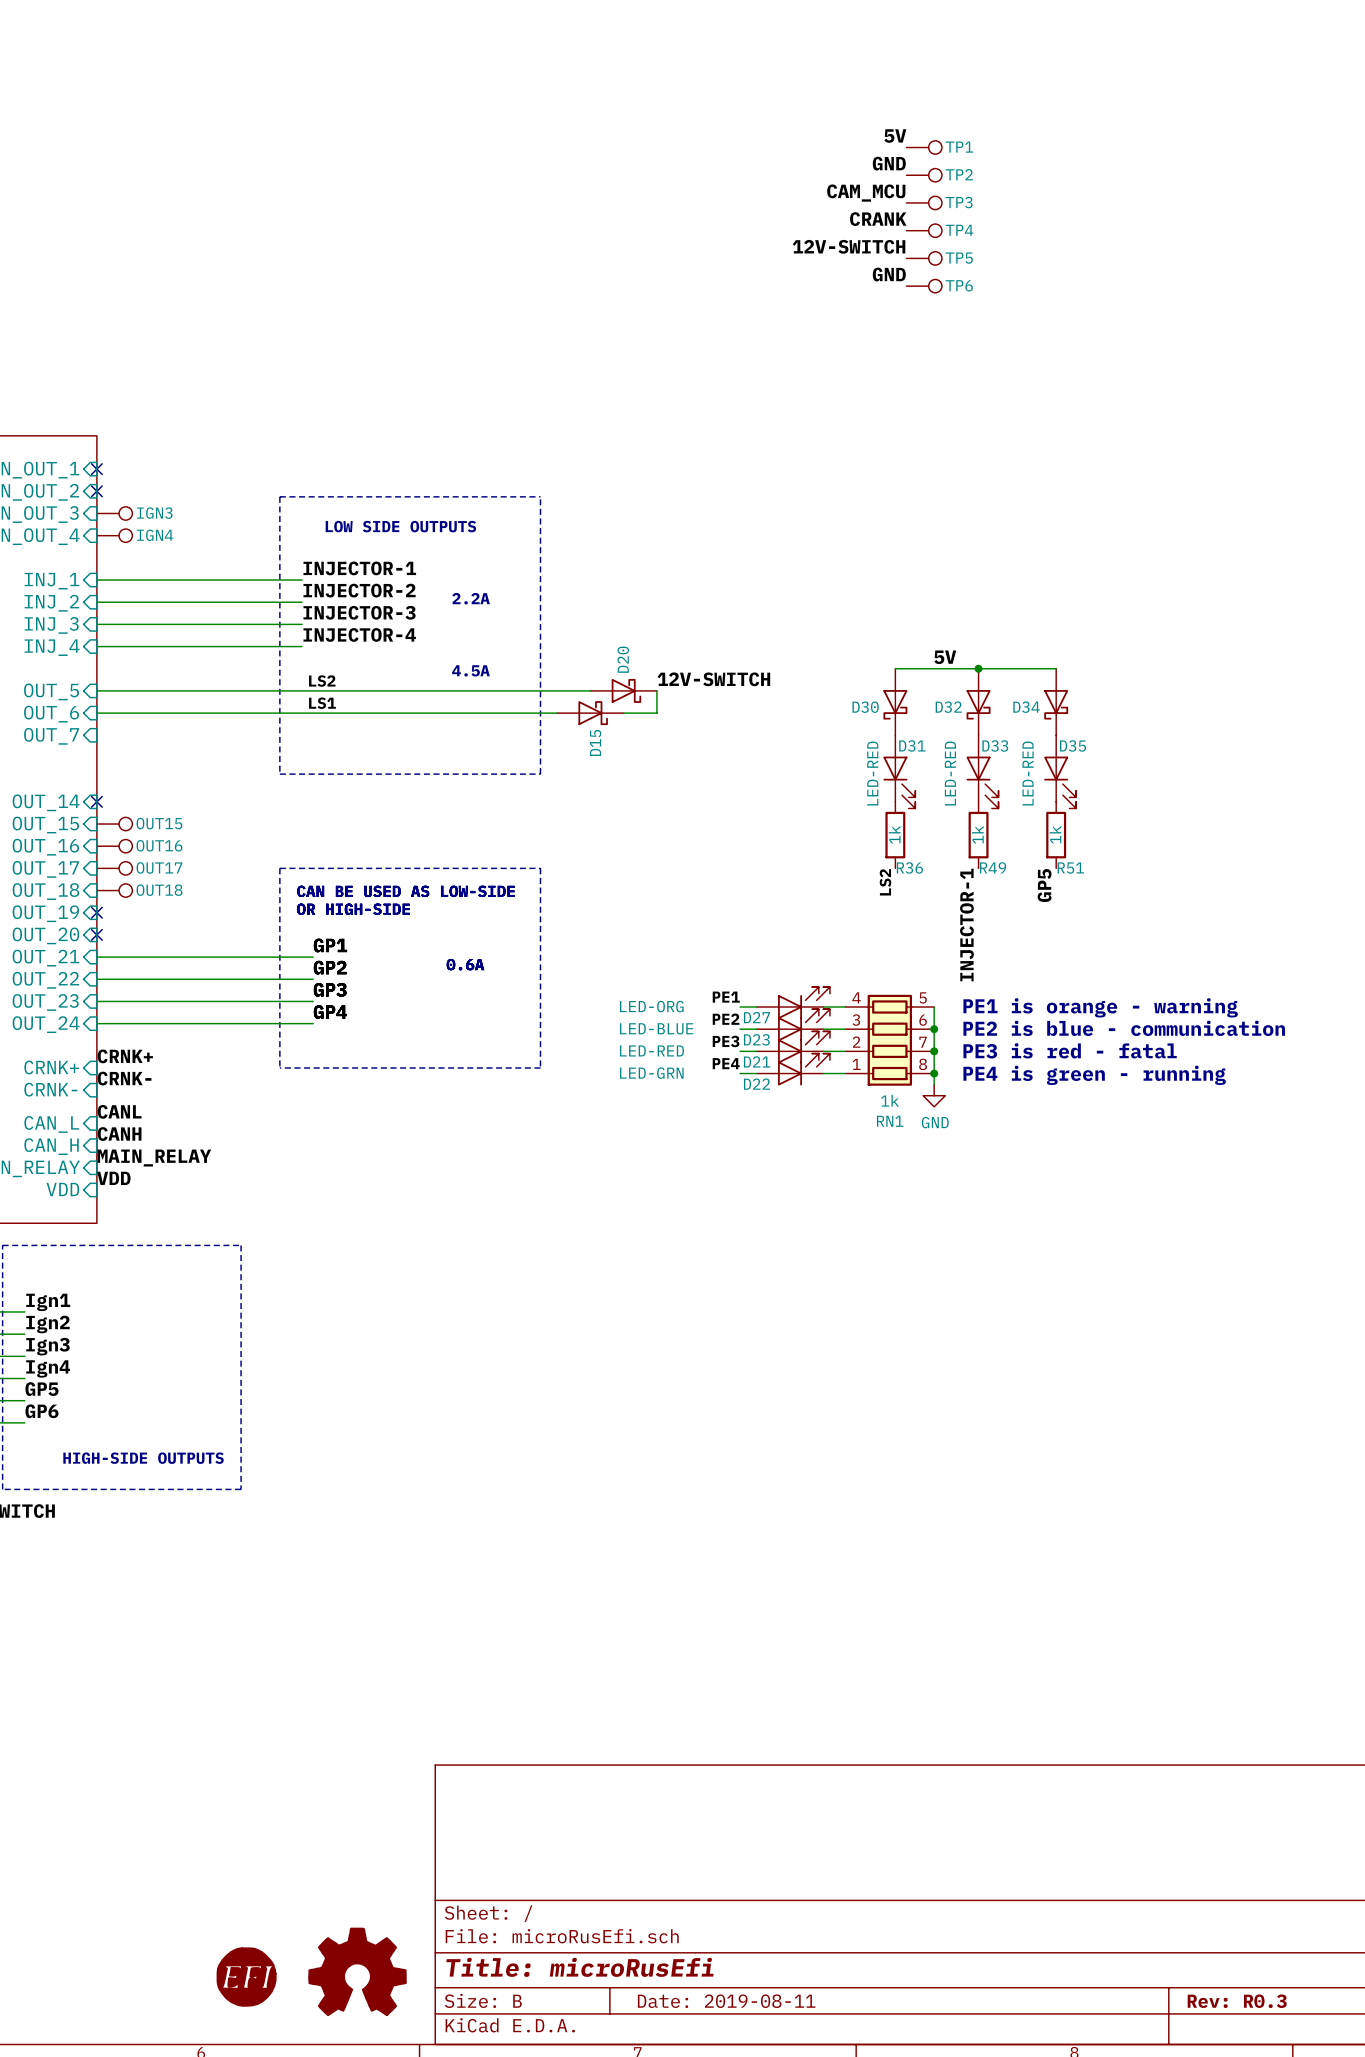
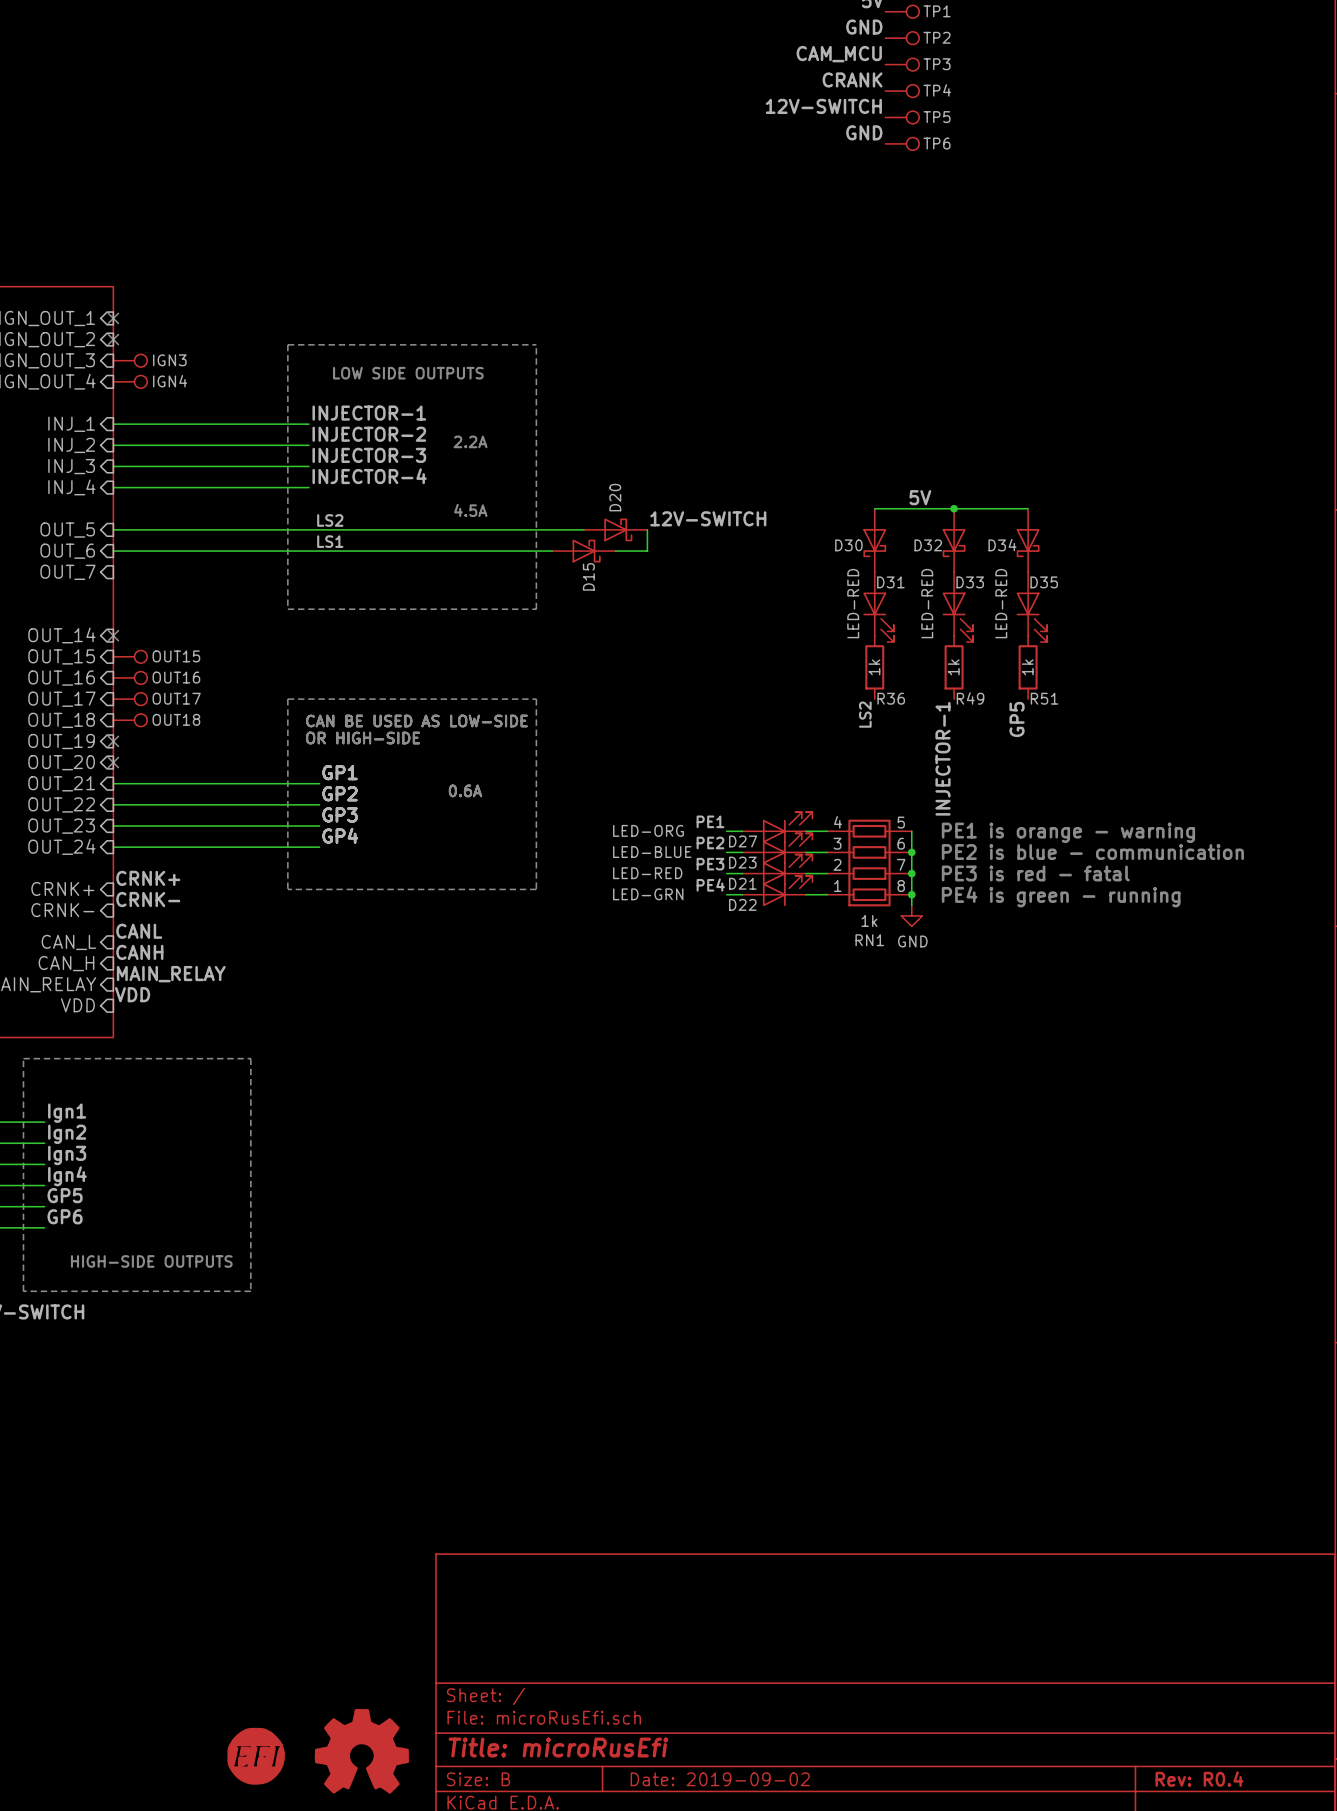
title block: Date: 2019-08-11 (726, 2001) -> Date: 2019-09-02 (720, 1779)
title block: Rev: R0.3 (1237, 2001) -> Rev: R0.4 (1199, 1779)

